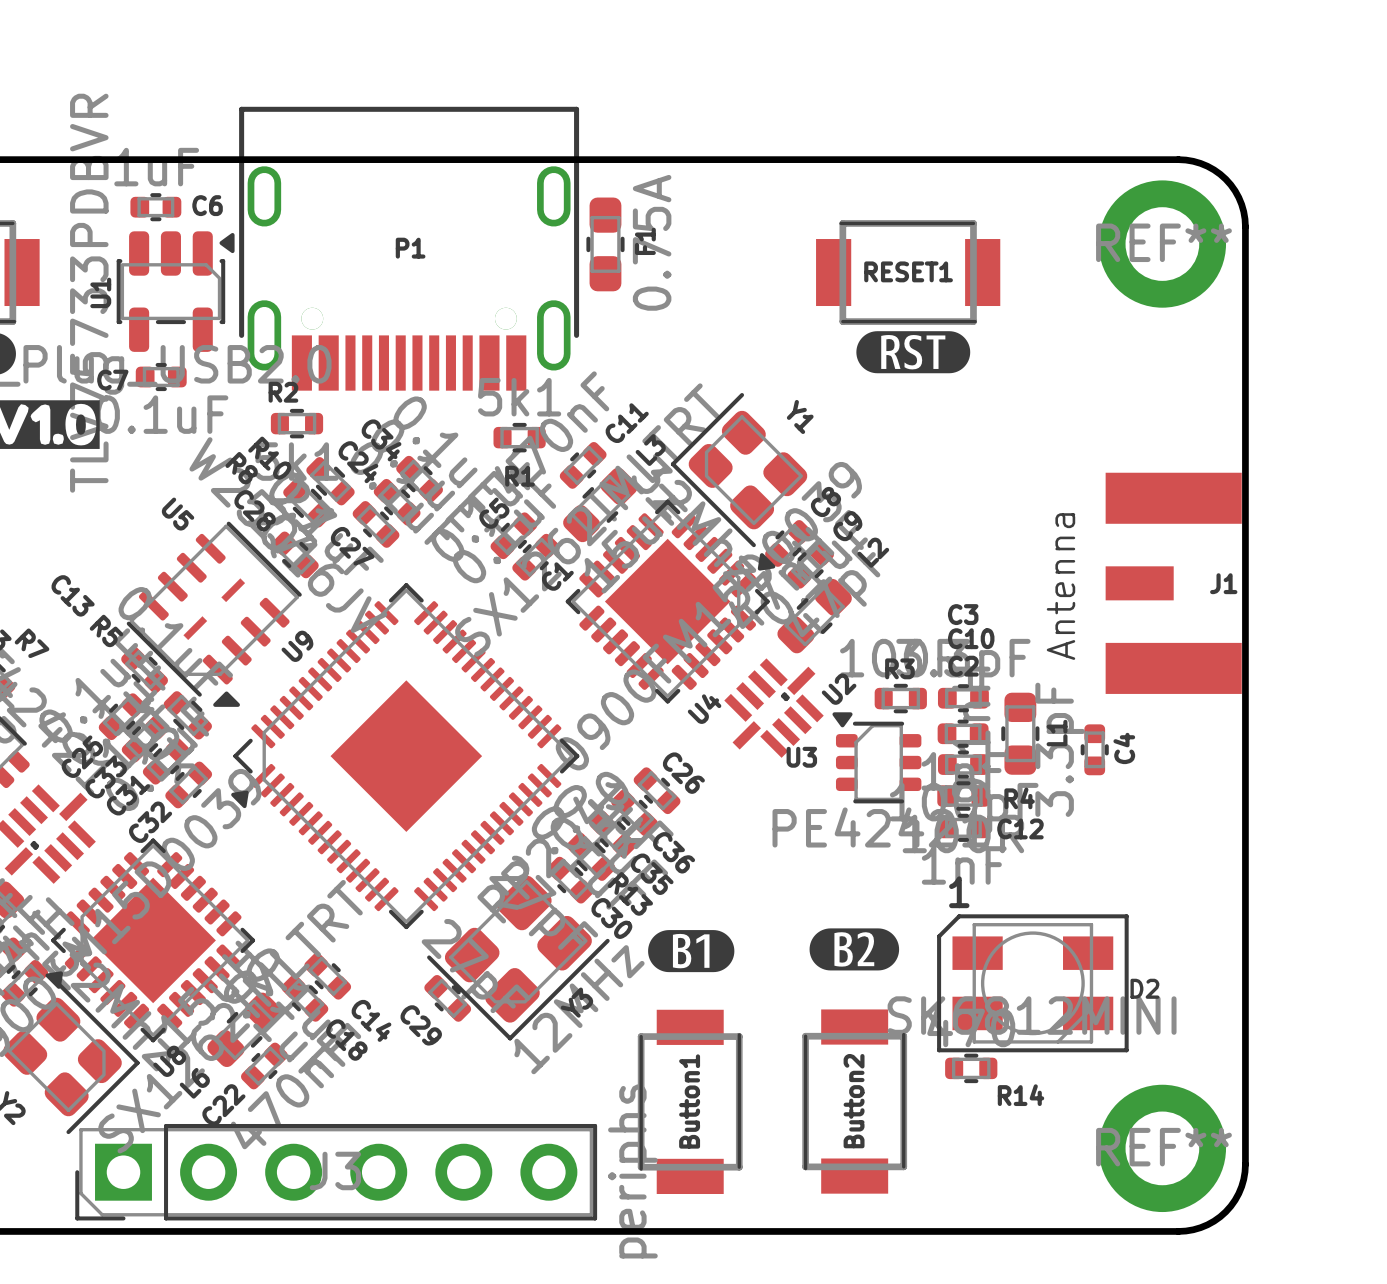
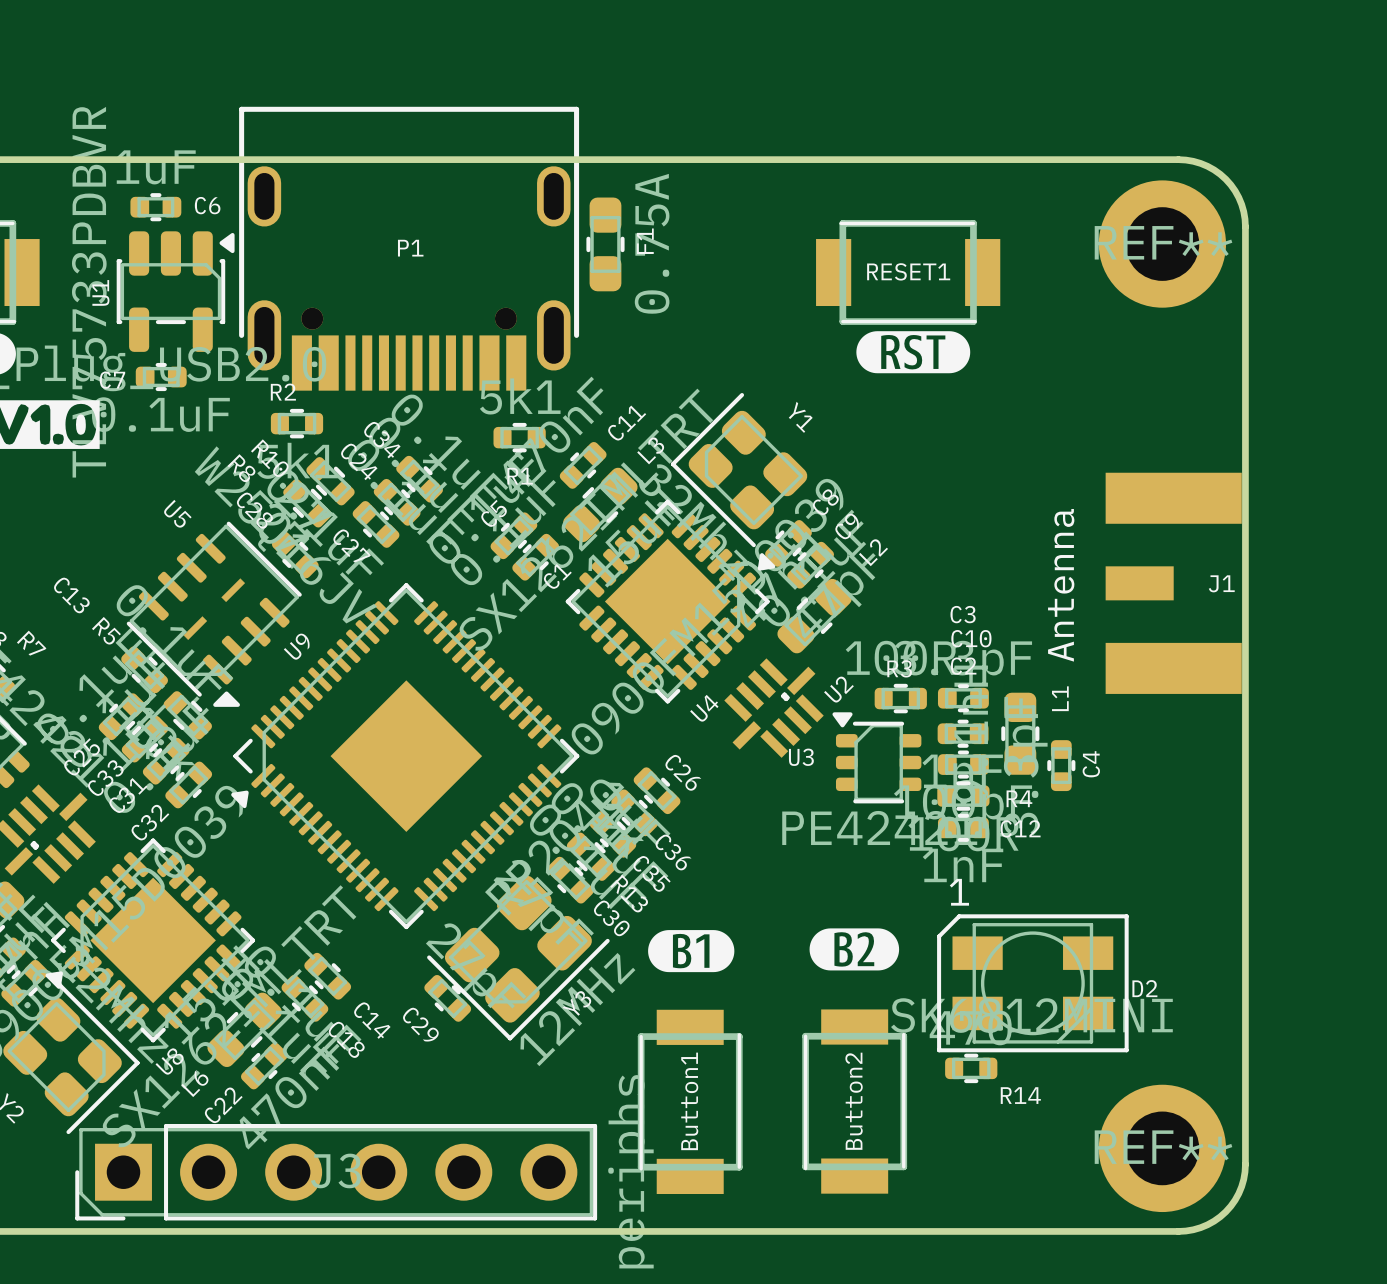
L1 name position: L1 (1057, 733) -> L1 (1060, 698)
C4 position: (1094, 749) -> (1061, 765)

